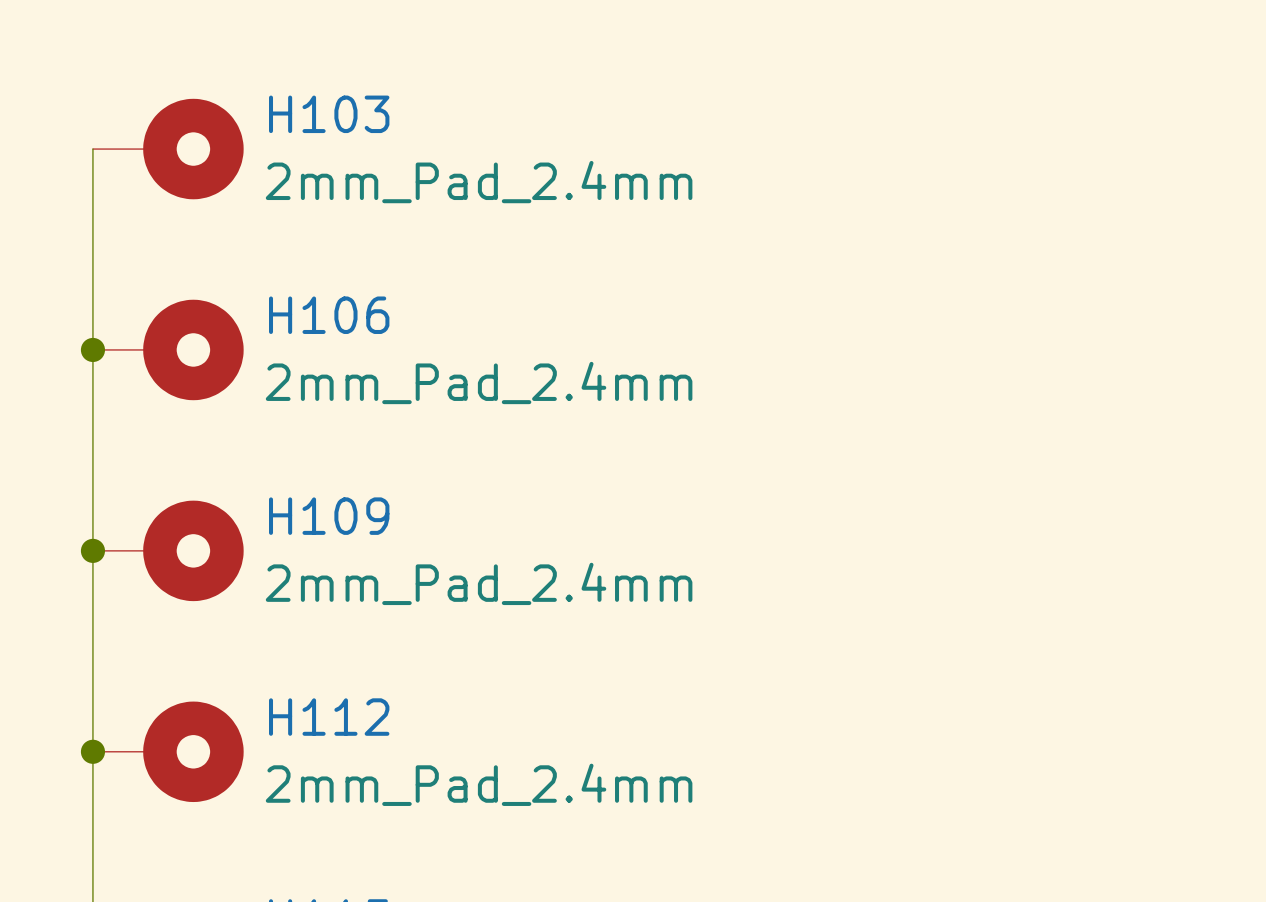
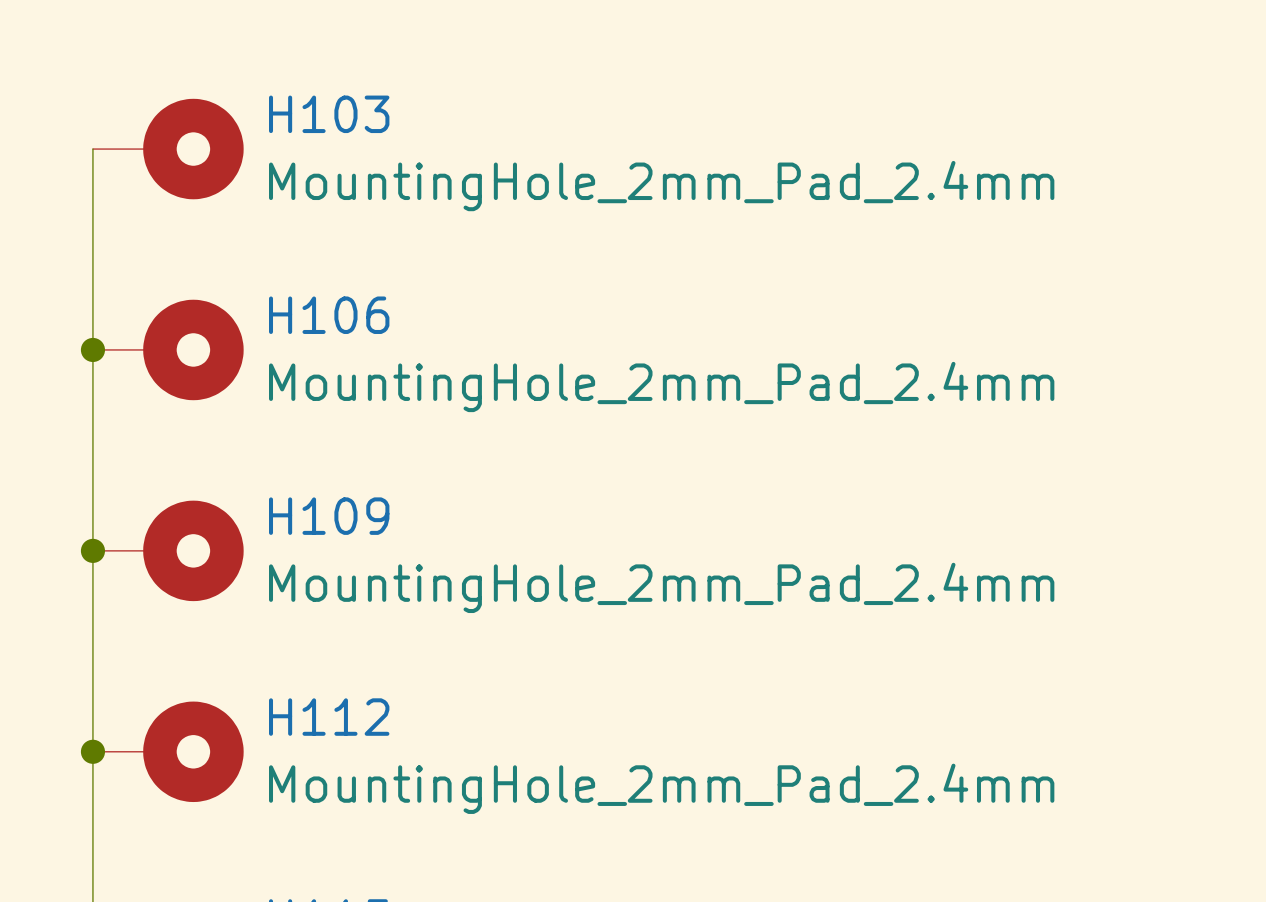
H103 value: 2mm_Pad_2.4mm (479, 182) -> MountingHole_2mm_Pad_2.4mm (661, 186)
H106 value: 2mm_Pad_2.4mm (479, 382) -> MountingHole_2mm_Pad_2.4mm (661, 386)
H109 value: 2mm_Pad_2.4mm (479, 583) -> MountingHole_2mm_Pad_2.4mm (661, 587)
H112 value: 2mm_Pad_2.4mm (479, 784) -> MountingHole_2mm_Pad_2.4mm (661, 788)

